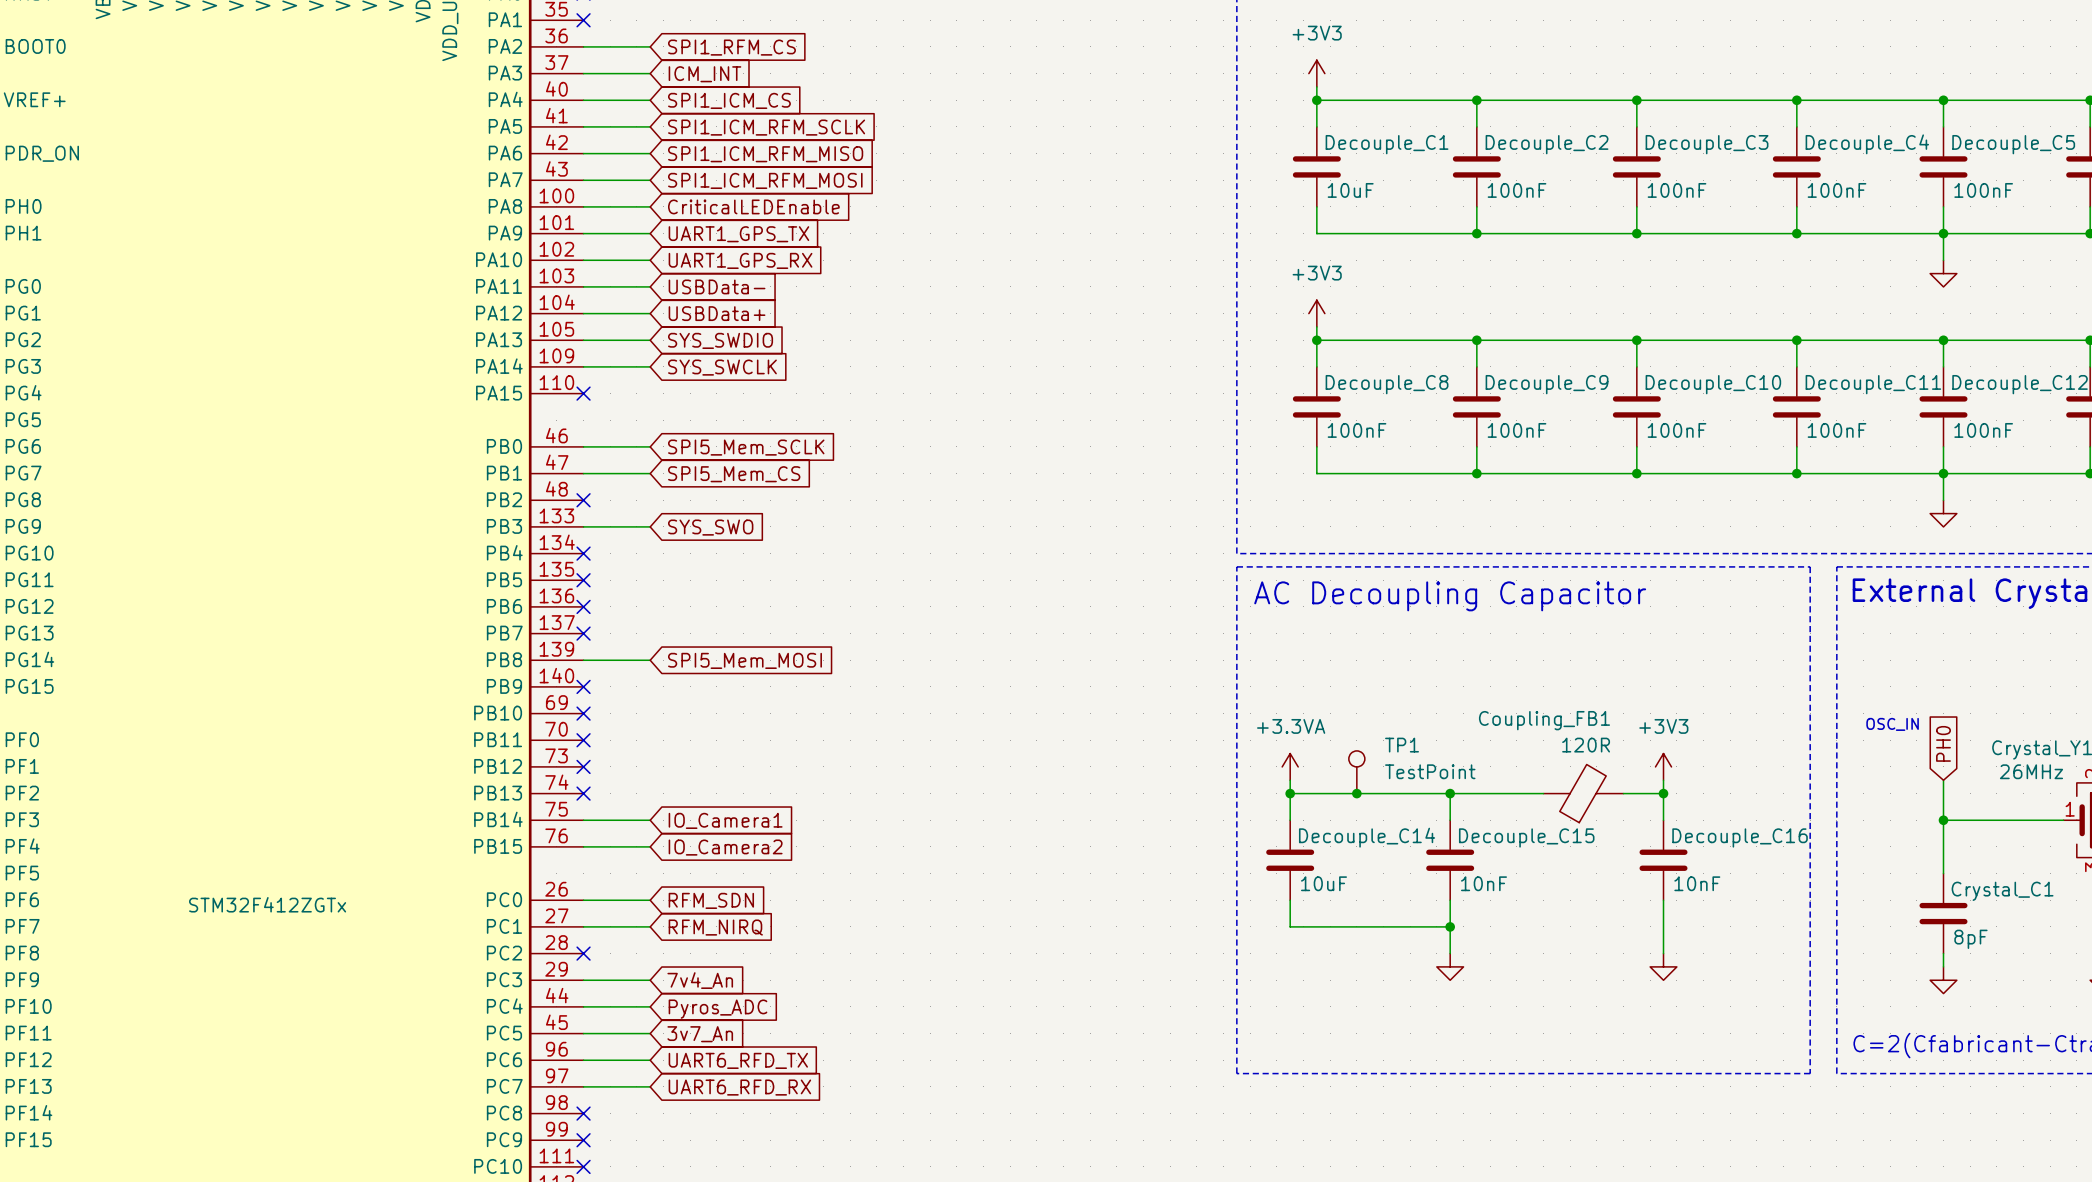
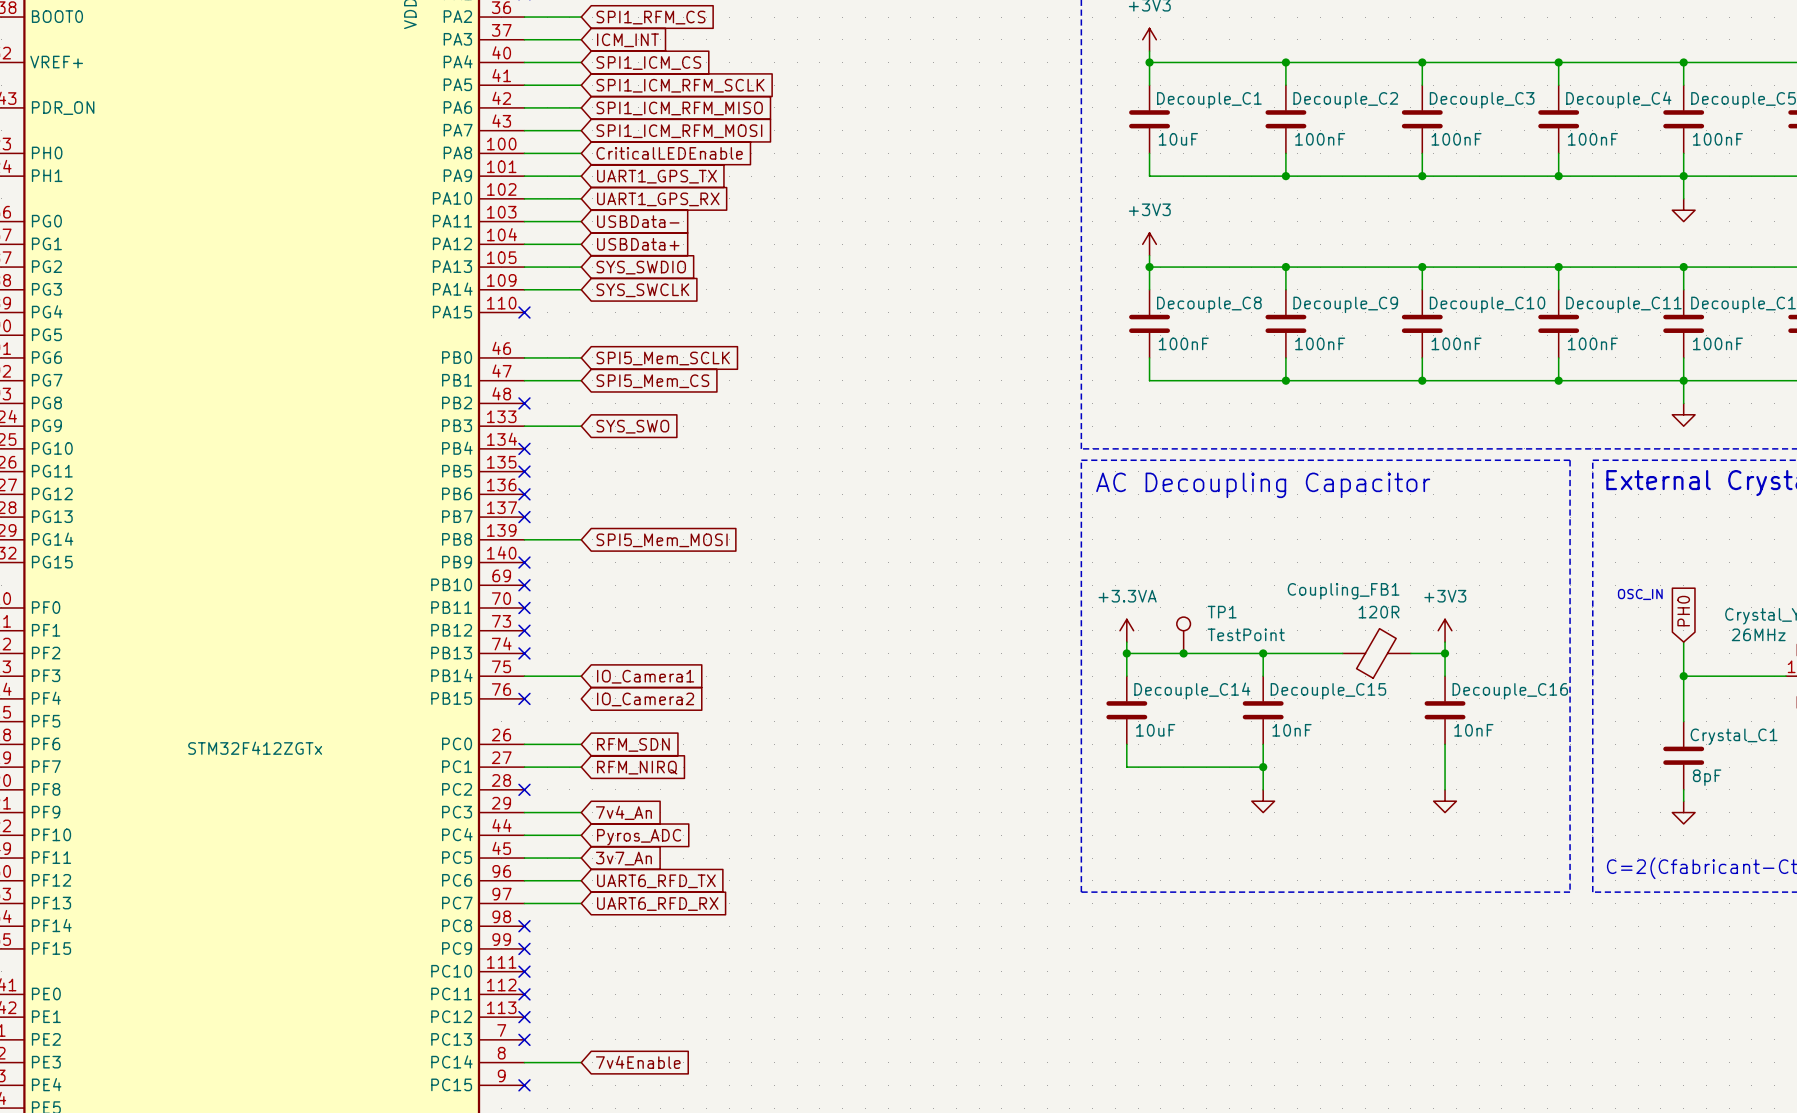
wire: (583, 846) (650, 846) -> none
no-connect mark: none -> (524, 698)

